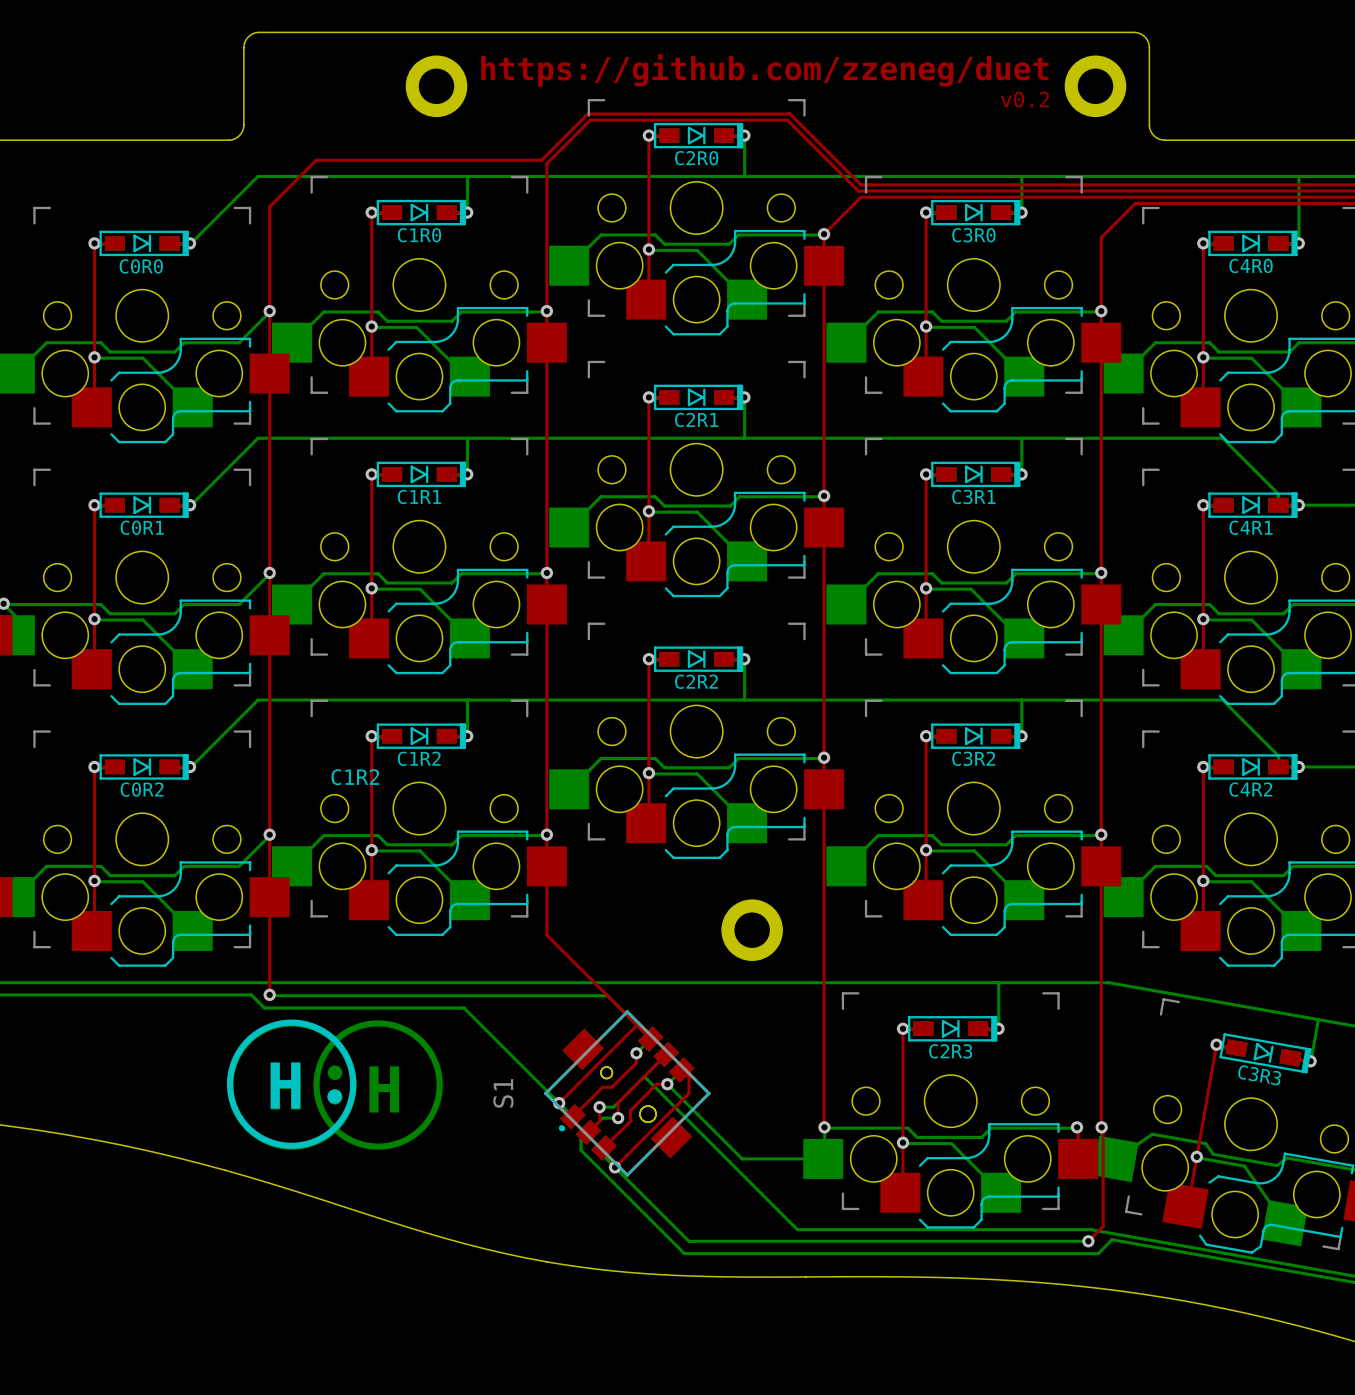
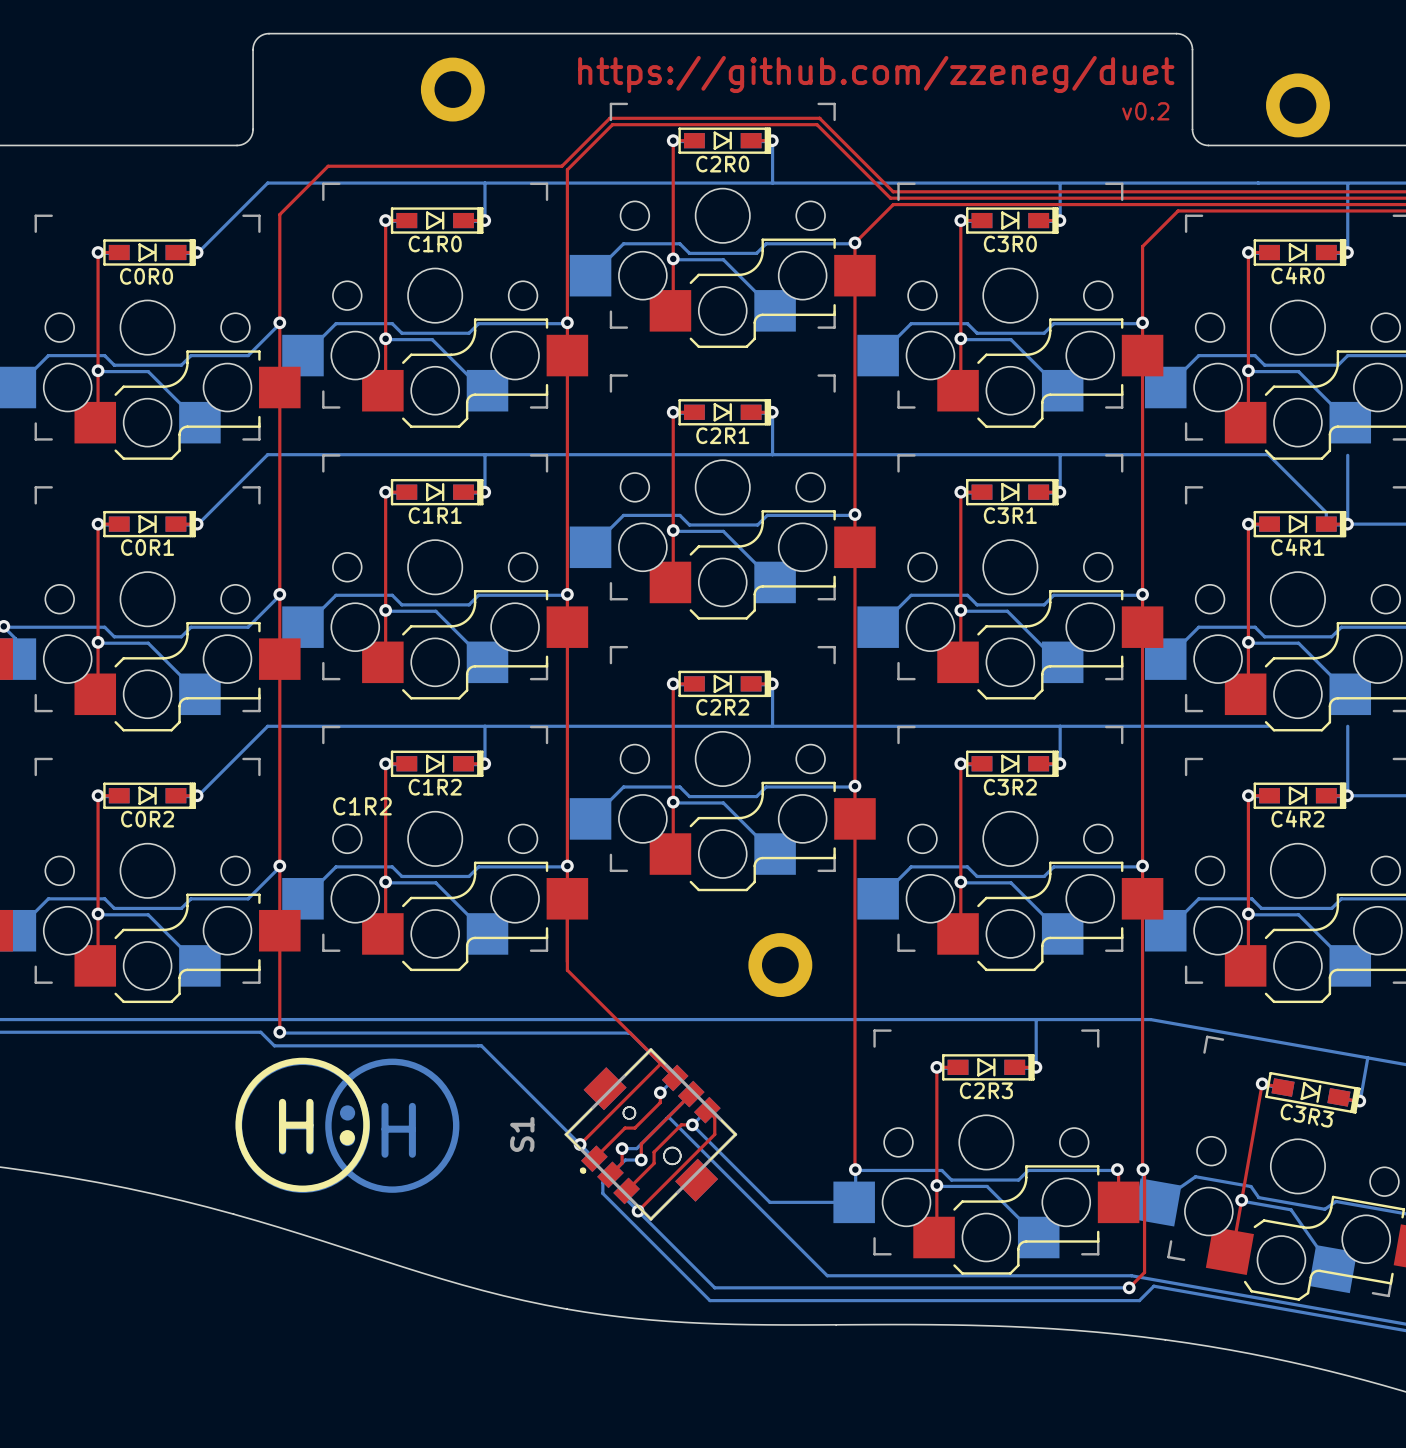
text position: https://github.com/zzeneg/duet (764, 70) -> https://github.com/zzeneg/duet (876, 74)
part position: (1095, 86) -> (1297, 105)
text position: v0.2 (1025, 99) -> v0.2 (1145, 111)
bottom track: none -> (1347, 455) (1347, 524)
bottom track: (1222, 700) (1278, 756) (1278, 767) -> (1347, 726) (1347, 796) (1326, 796)

